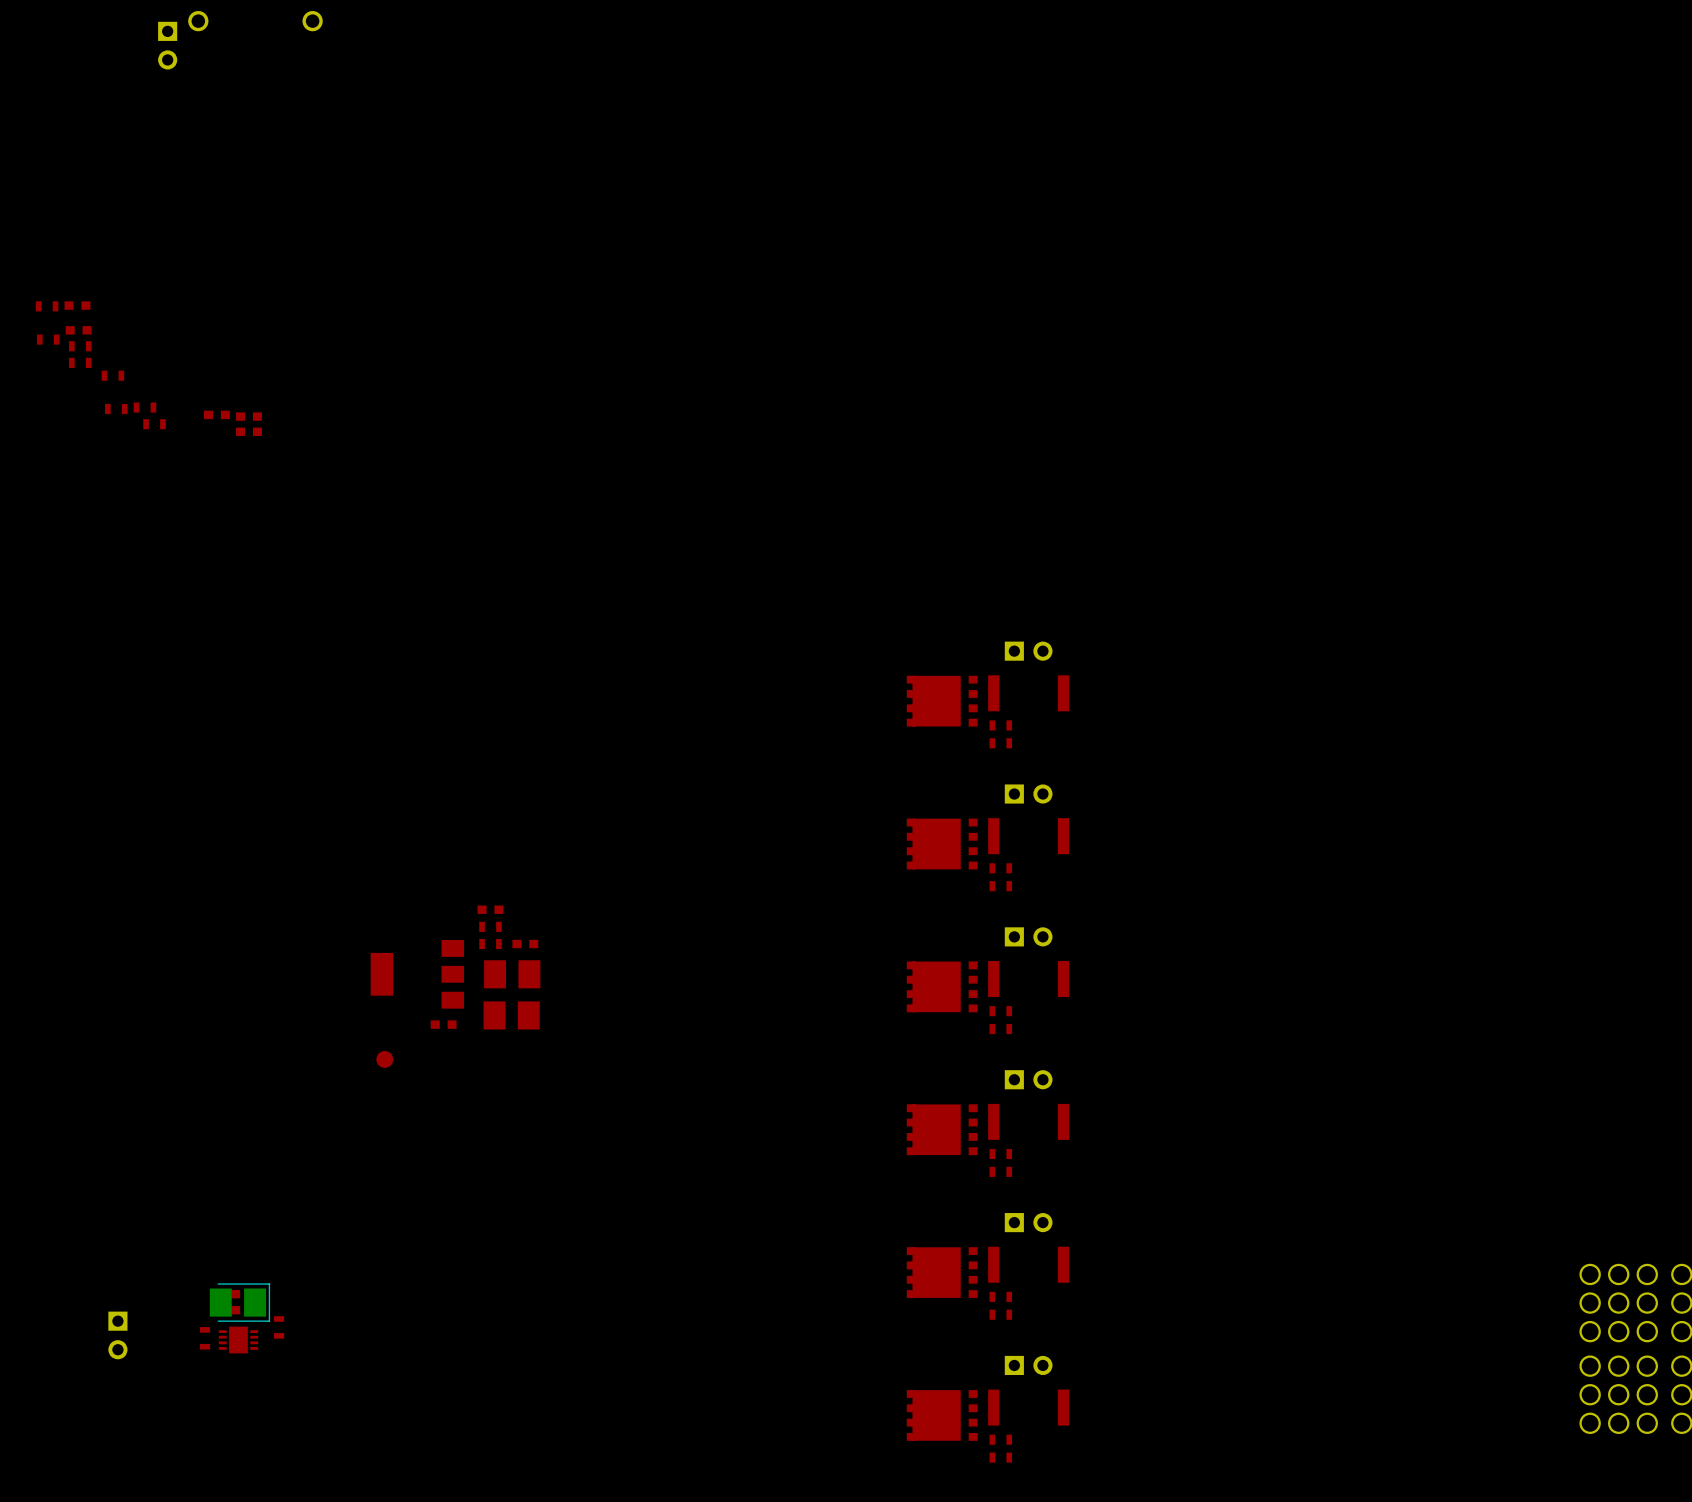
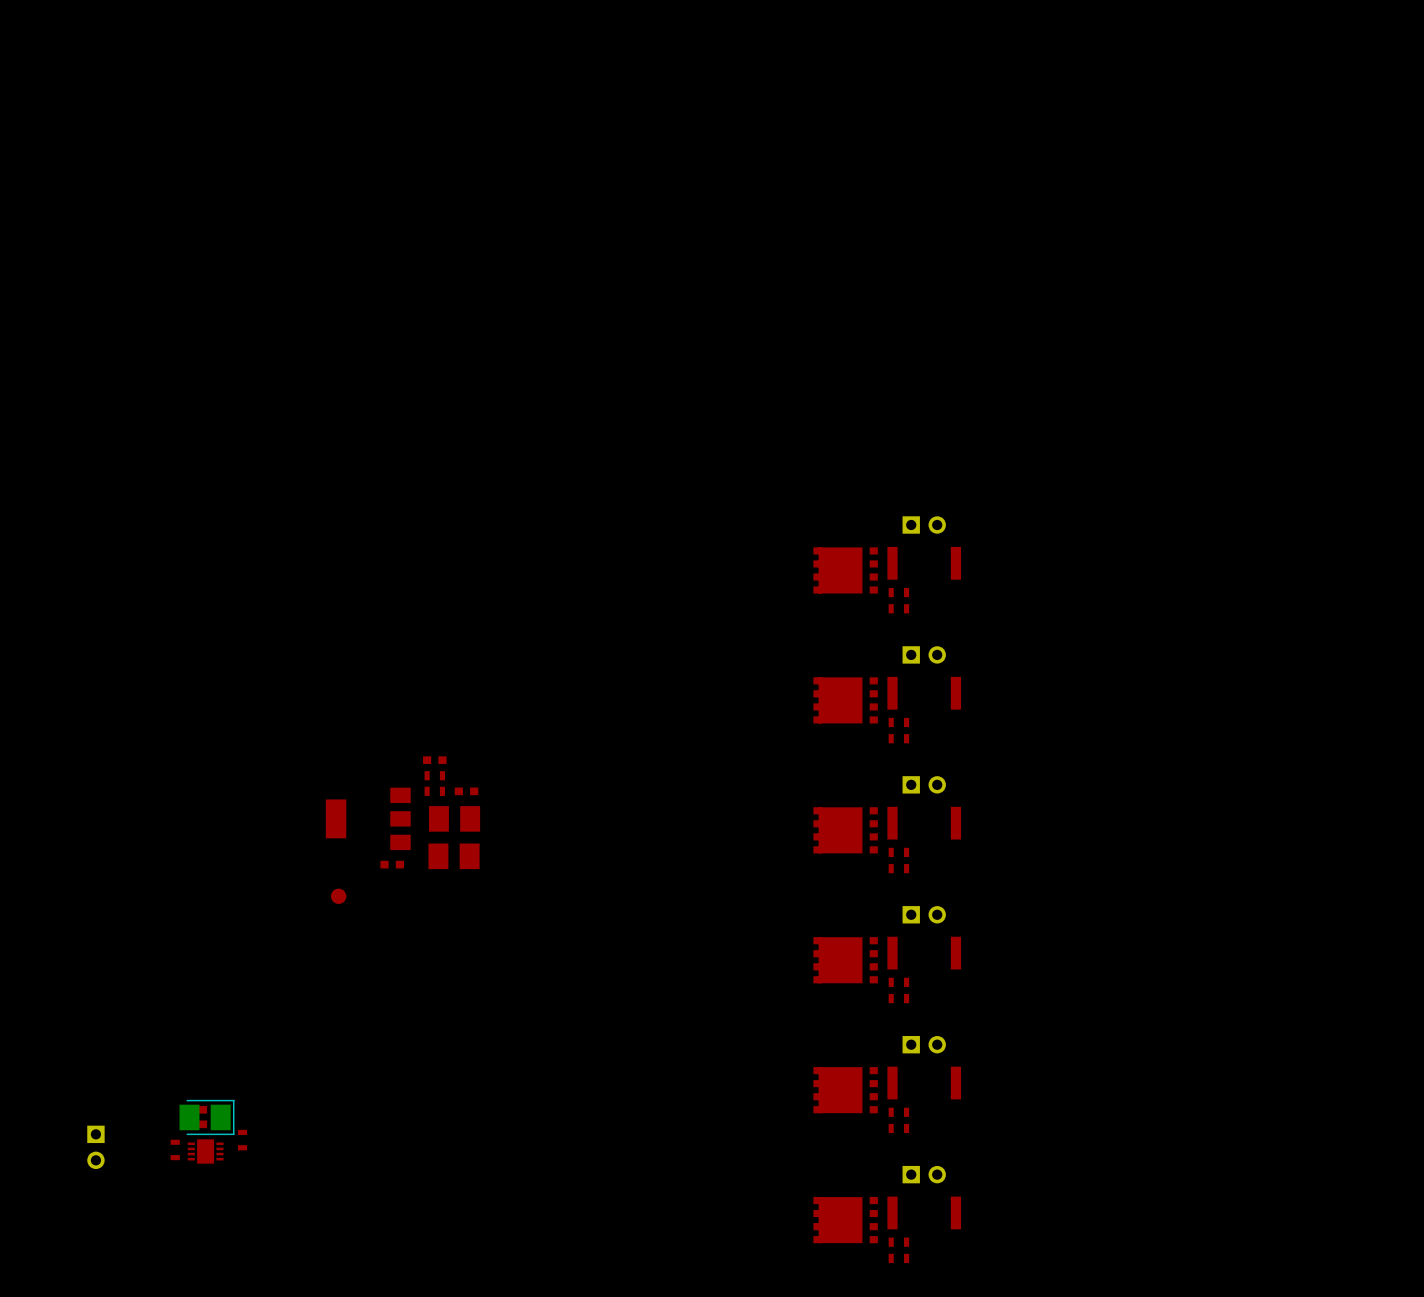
part: (77, 305) -> none
part: (47, 306) -> none
part: (78, 330) -> none
part: (48, 339) -> none
part: (80, 346) -> none
part: (80, 362) -> none
part: (112, 375) -> none
part: (144, 407) -> none
part: (116, 409) -> none
part: (216, 414) -> none
part: (249, 416) -> none
part: (154, 424) -> none
part: (249, 431) -> none

